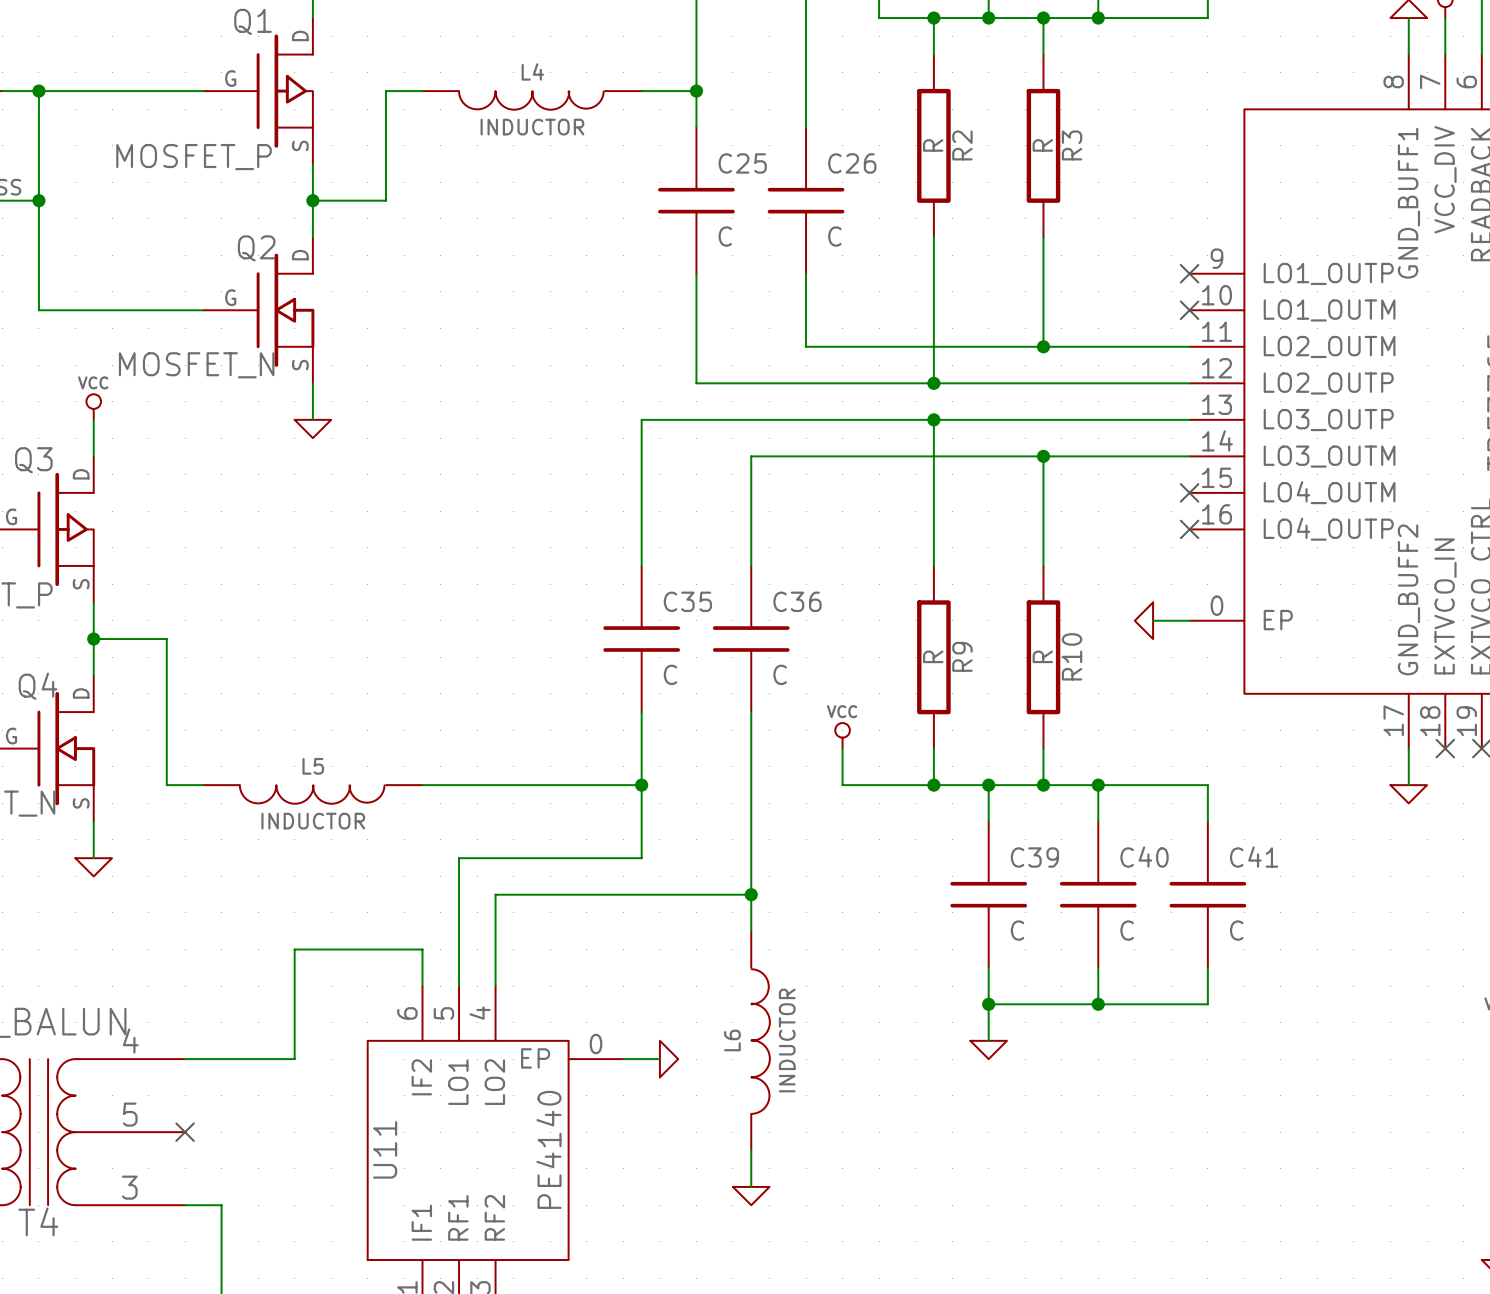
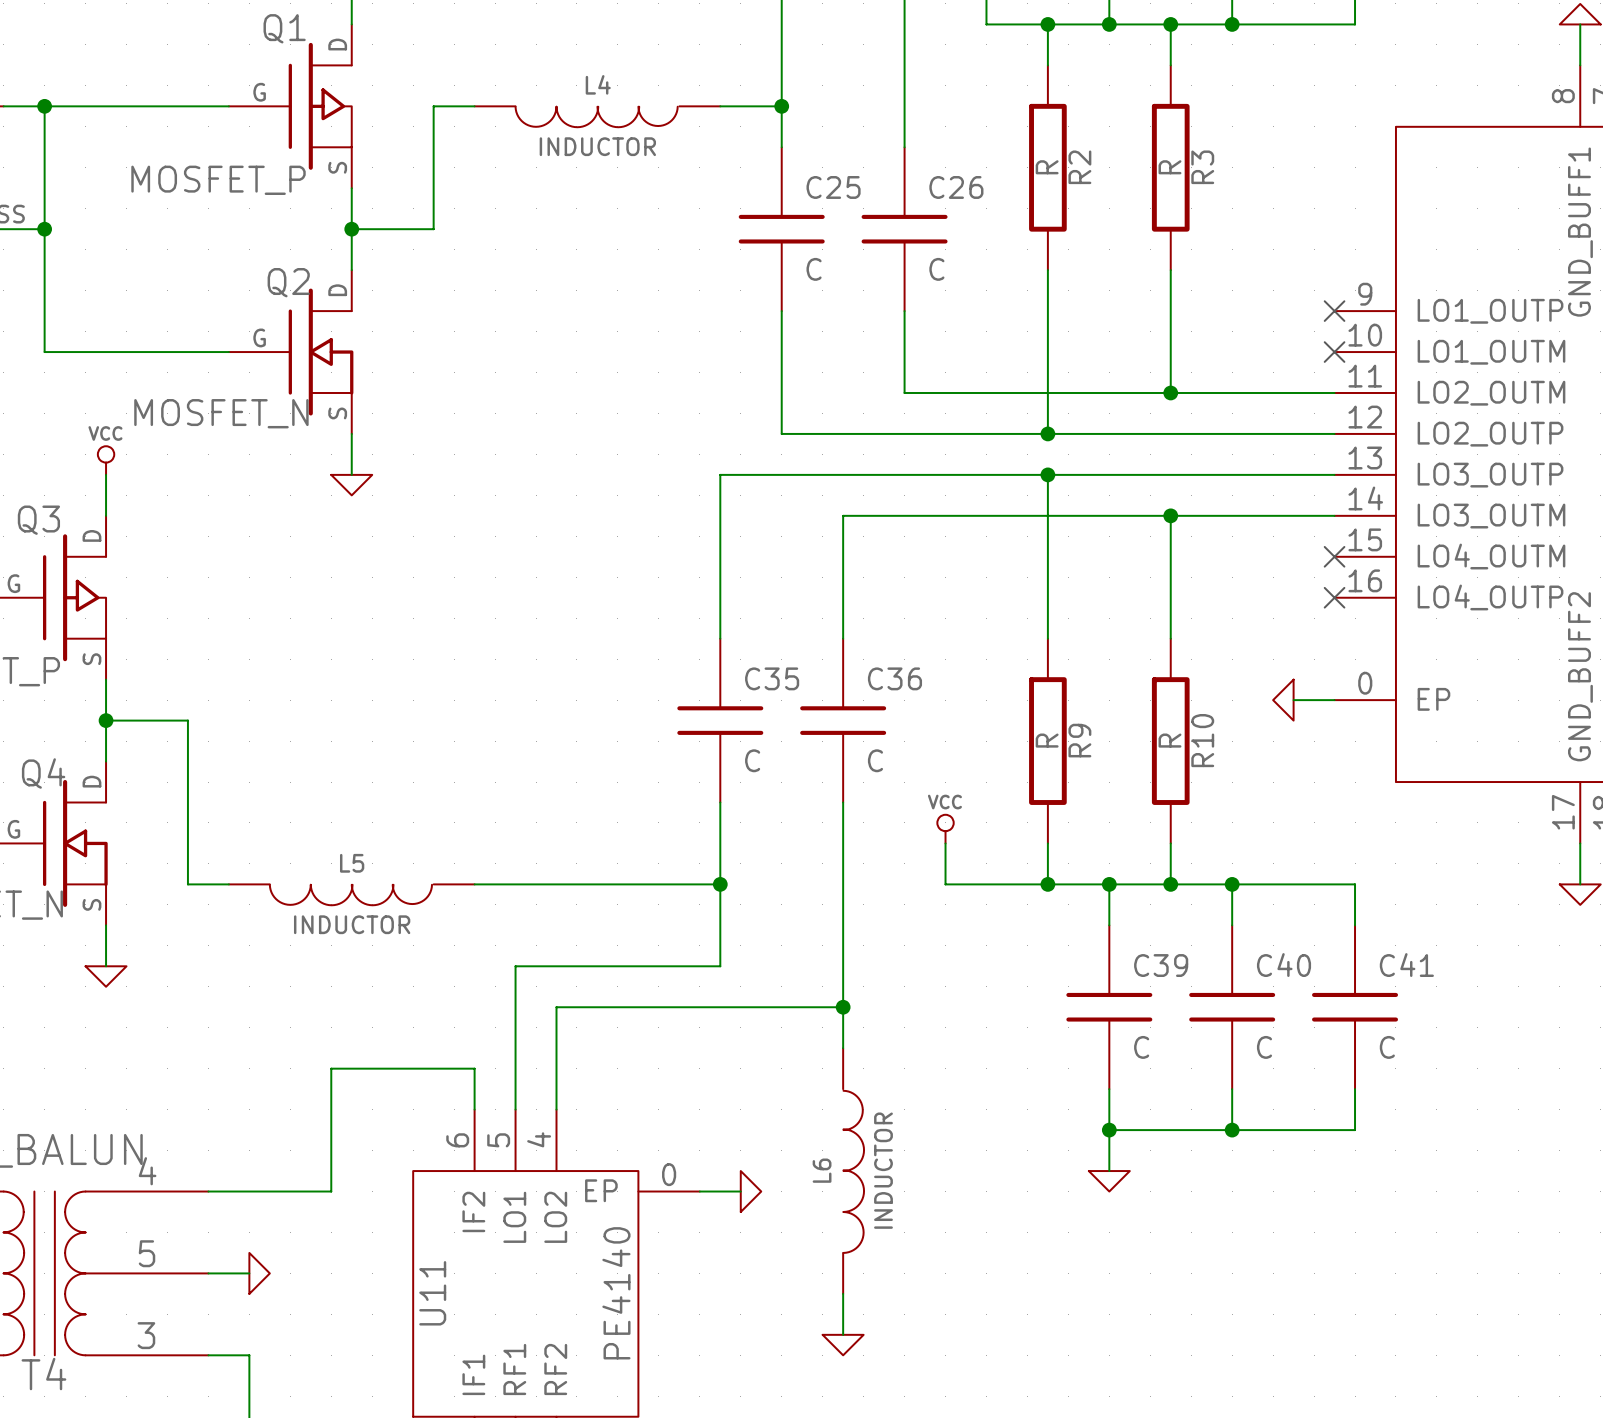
wire: none -> (208, 1273) (249, 1273)
no-connect mark: (185, 1132) -> none
power symbol: none -> (259, 1273)

